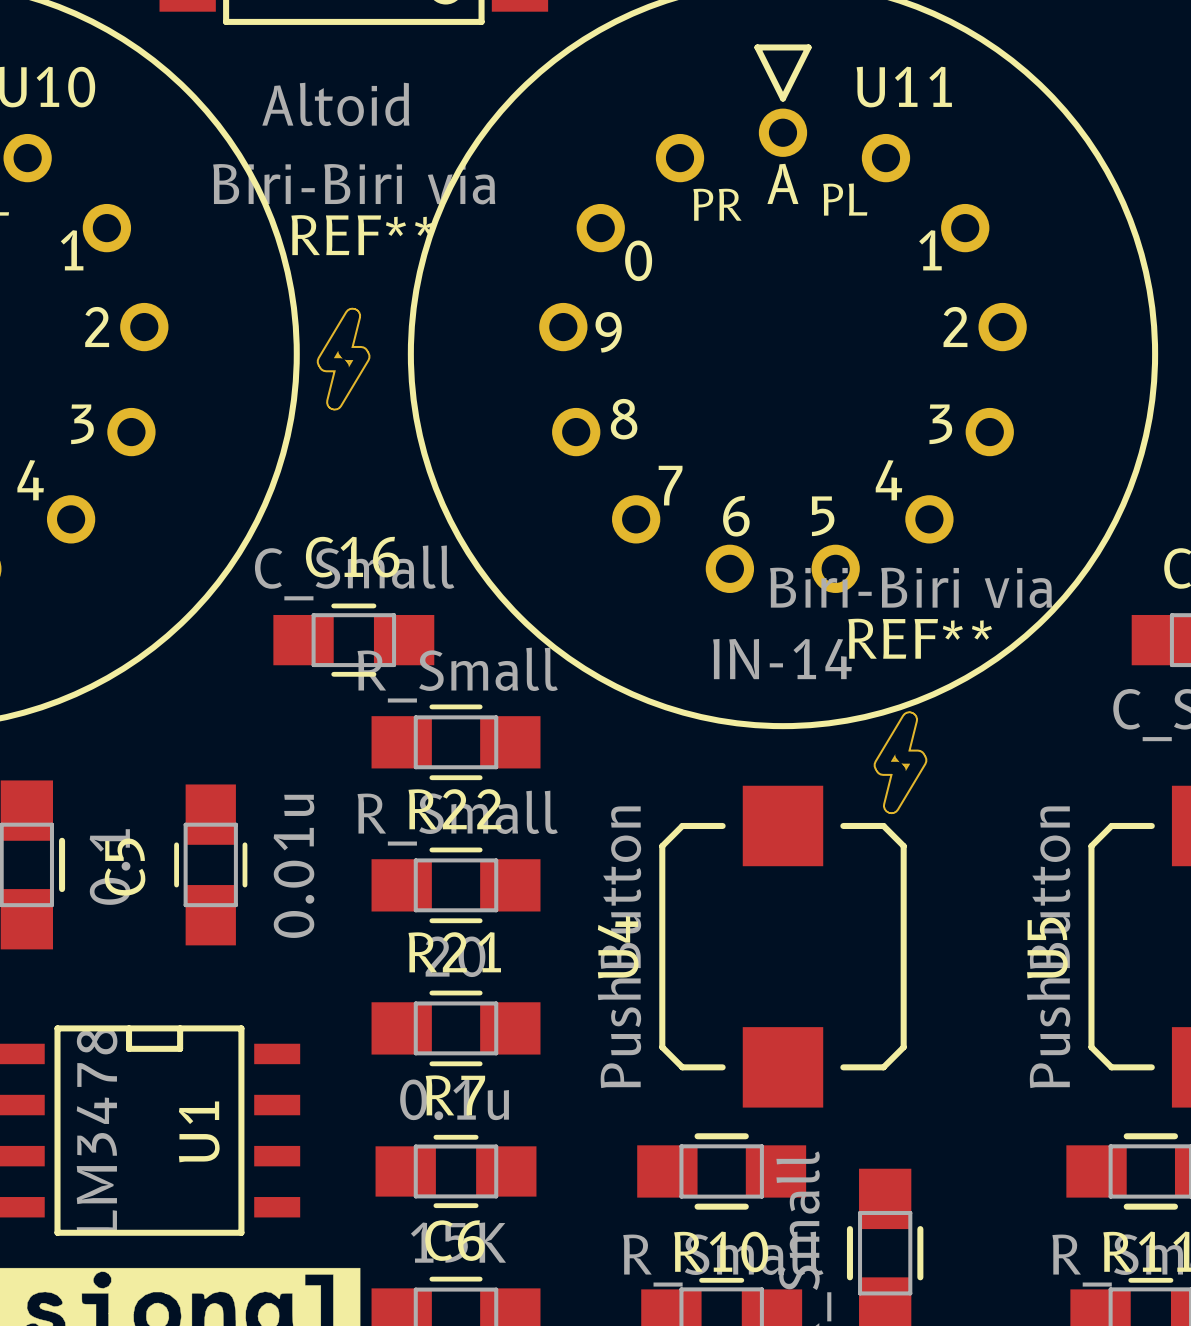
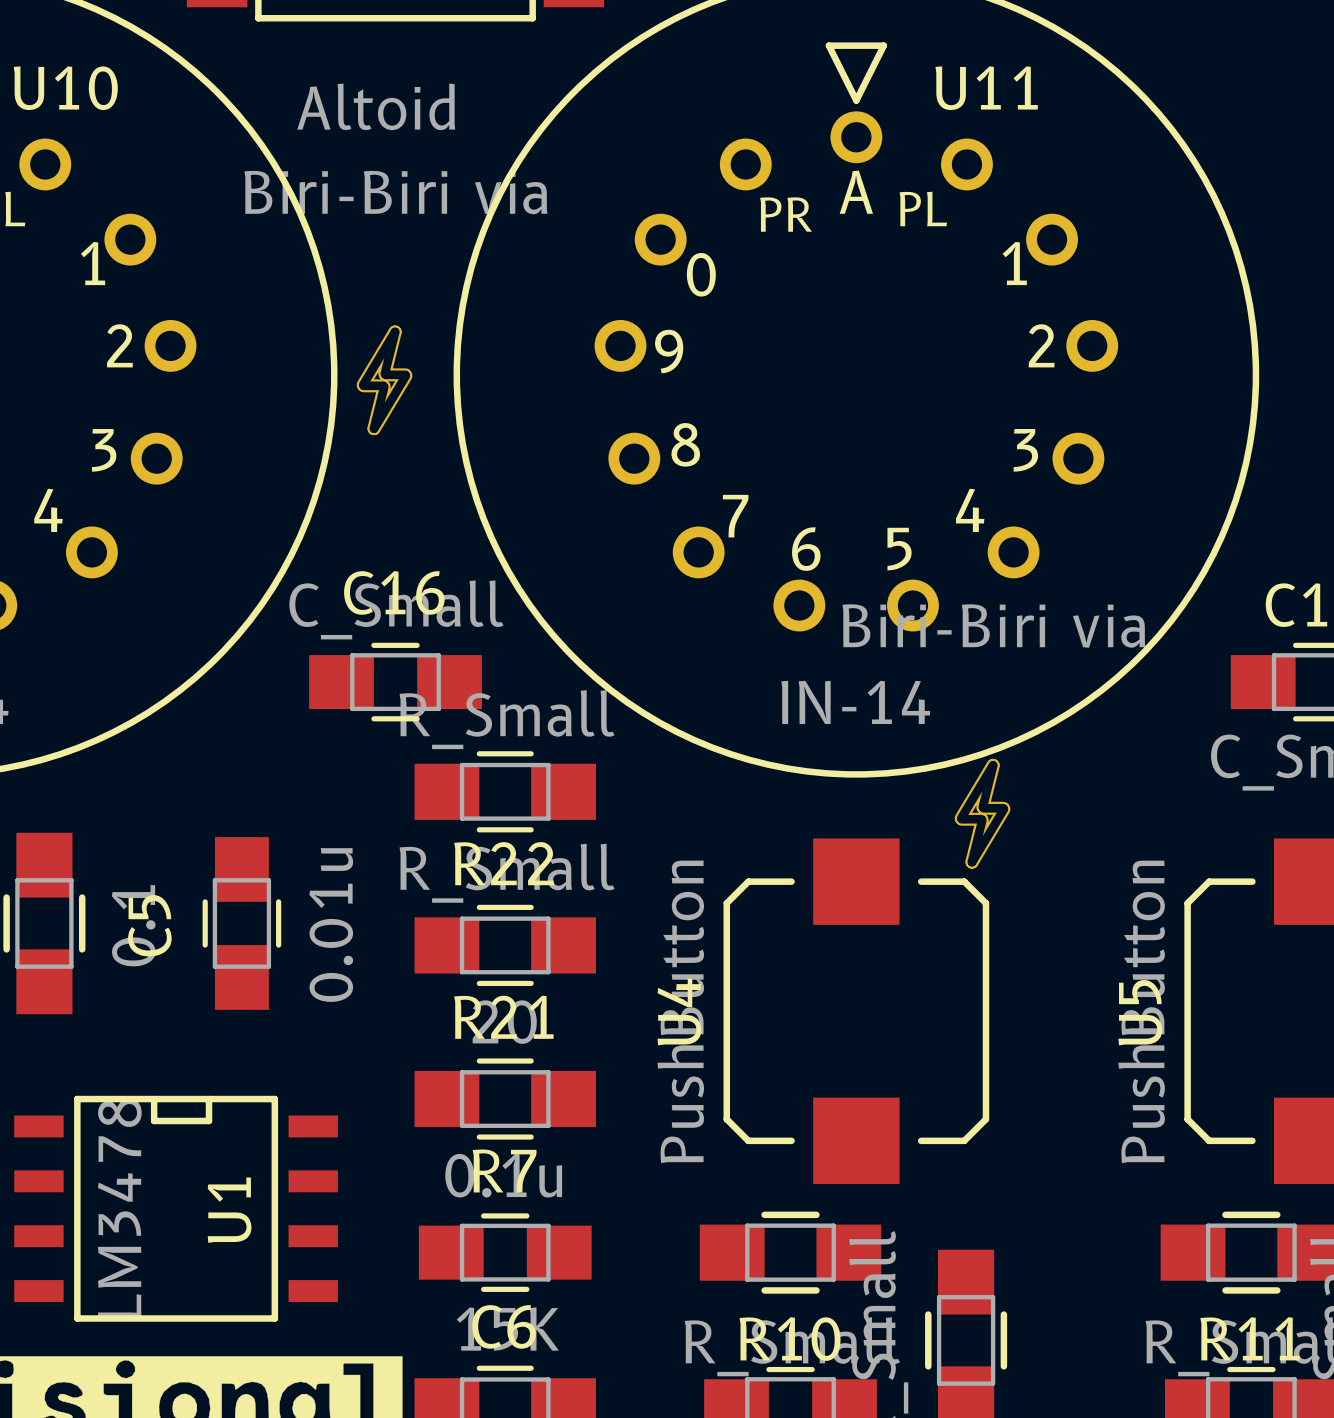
REF**: Biri-Biri via (343, 359) -> none
part: none -> Biri-Biri via (384, 380)
REF**: Biri-Biri via (900, 762) -> none
part: none -> Biri-Biri via (982, 813)

